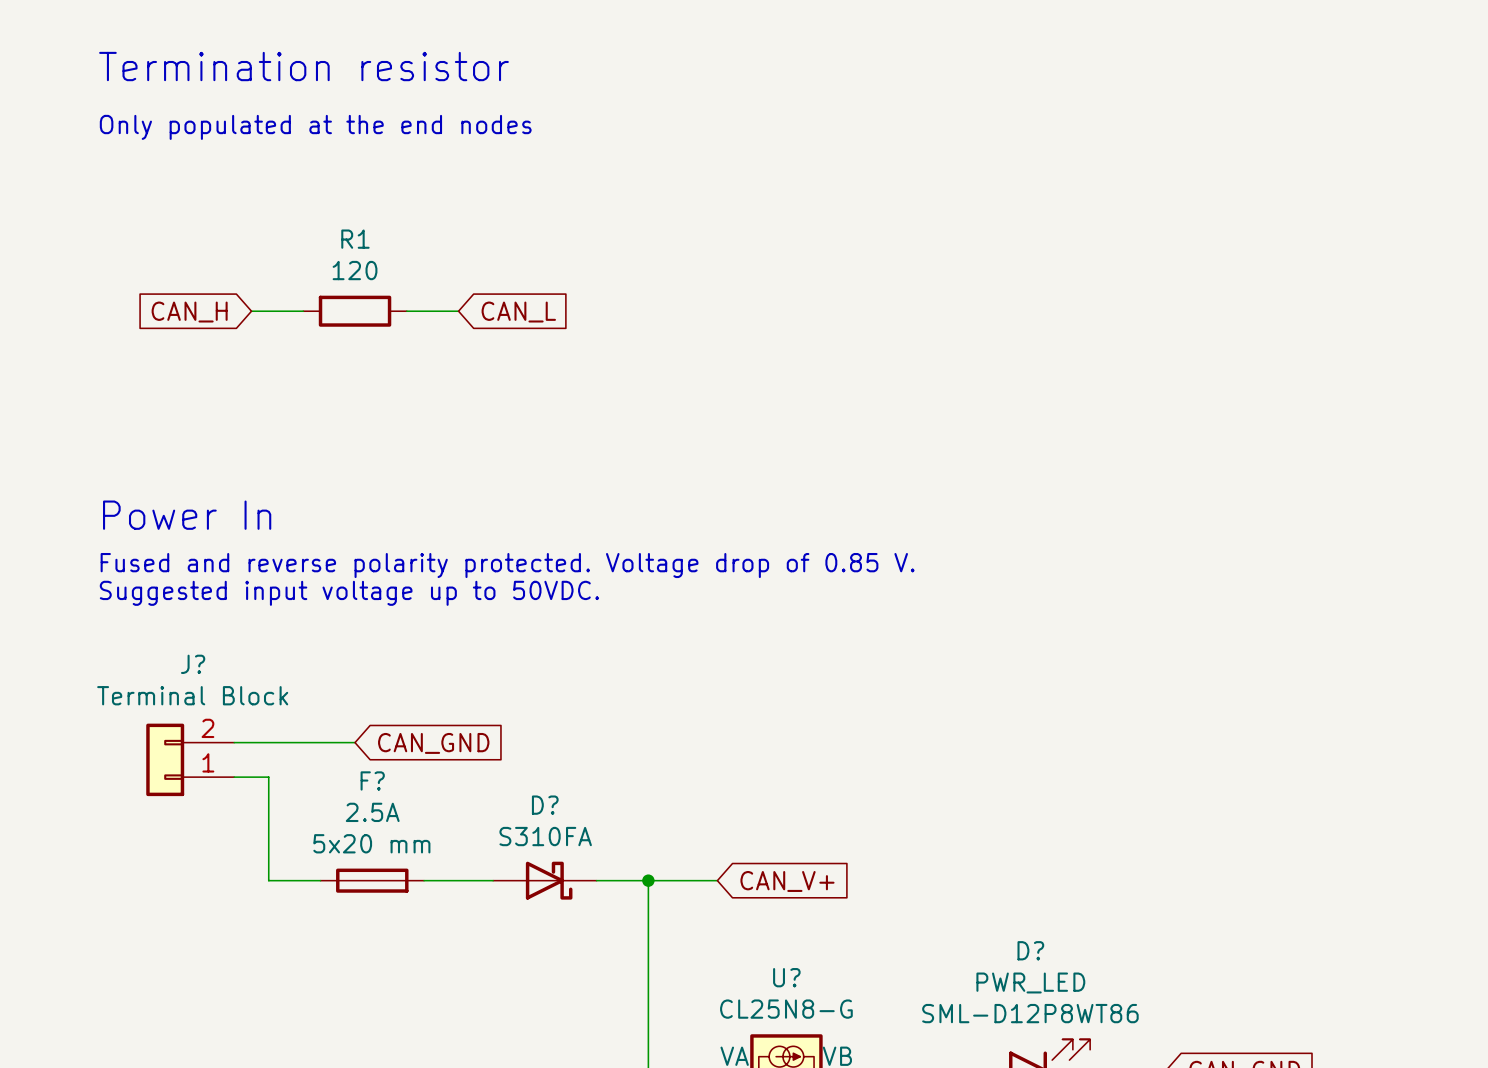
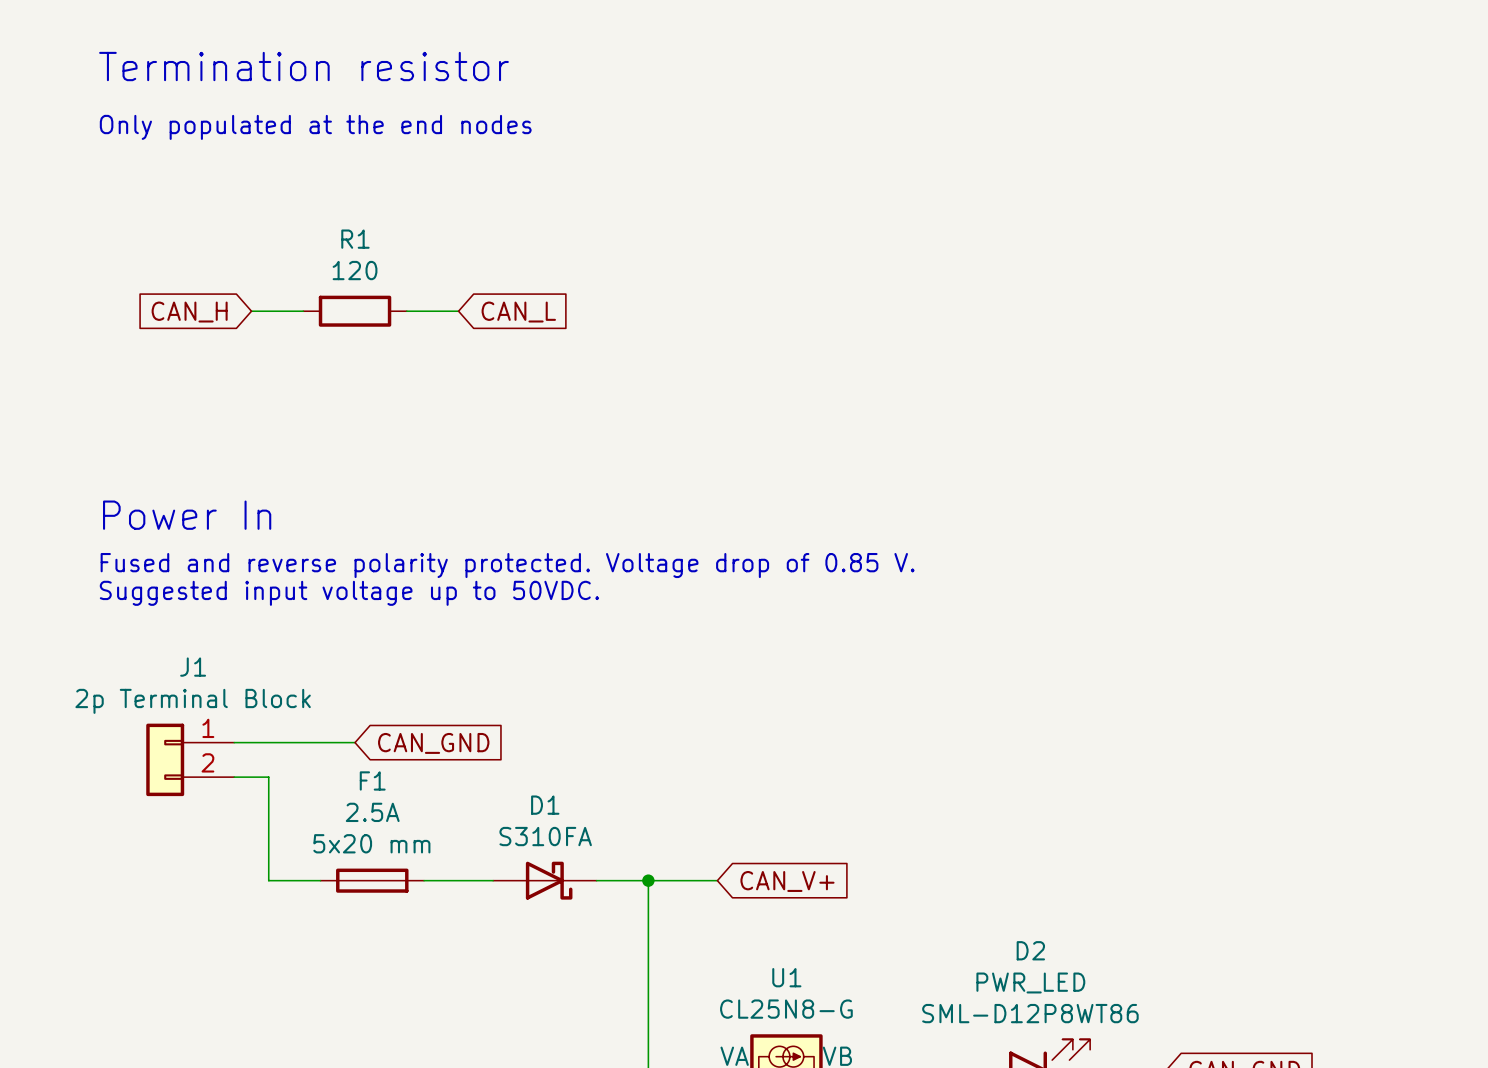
J? name: J? (193, 664) -> J1 (193, 667)
J? value: Terminal Block (192, 695) -> 2p Terminal Block (193, 701)
J? flip: as is (165, 759) -> up-down (165, 759)
F? name: F? (372, 780) -> F1 (372, 780)
D? name: D? (545, 805) -> D1 (545, 805)
D? name: D? (1030, 950) -> D2 (1030, 950)
U? name: U? (786, 977) -> U1 (786, 977)

